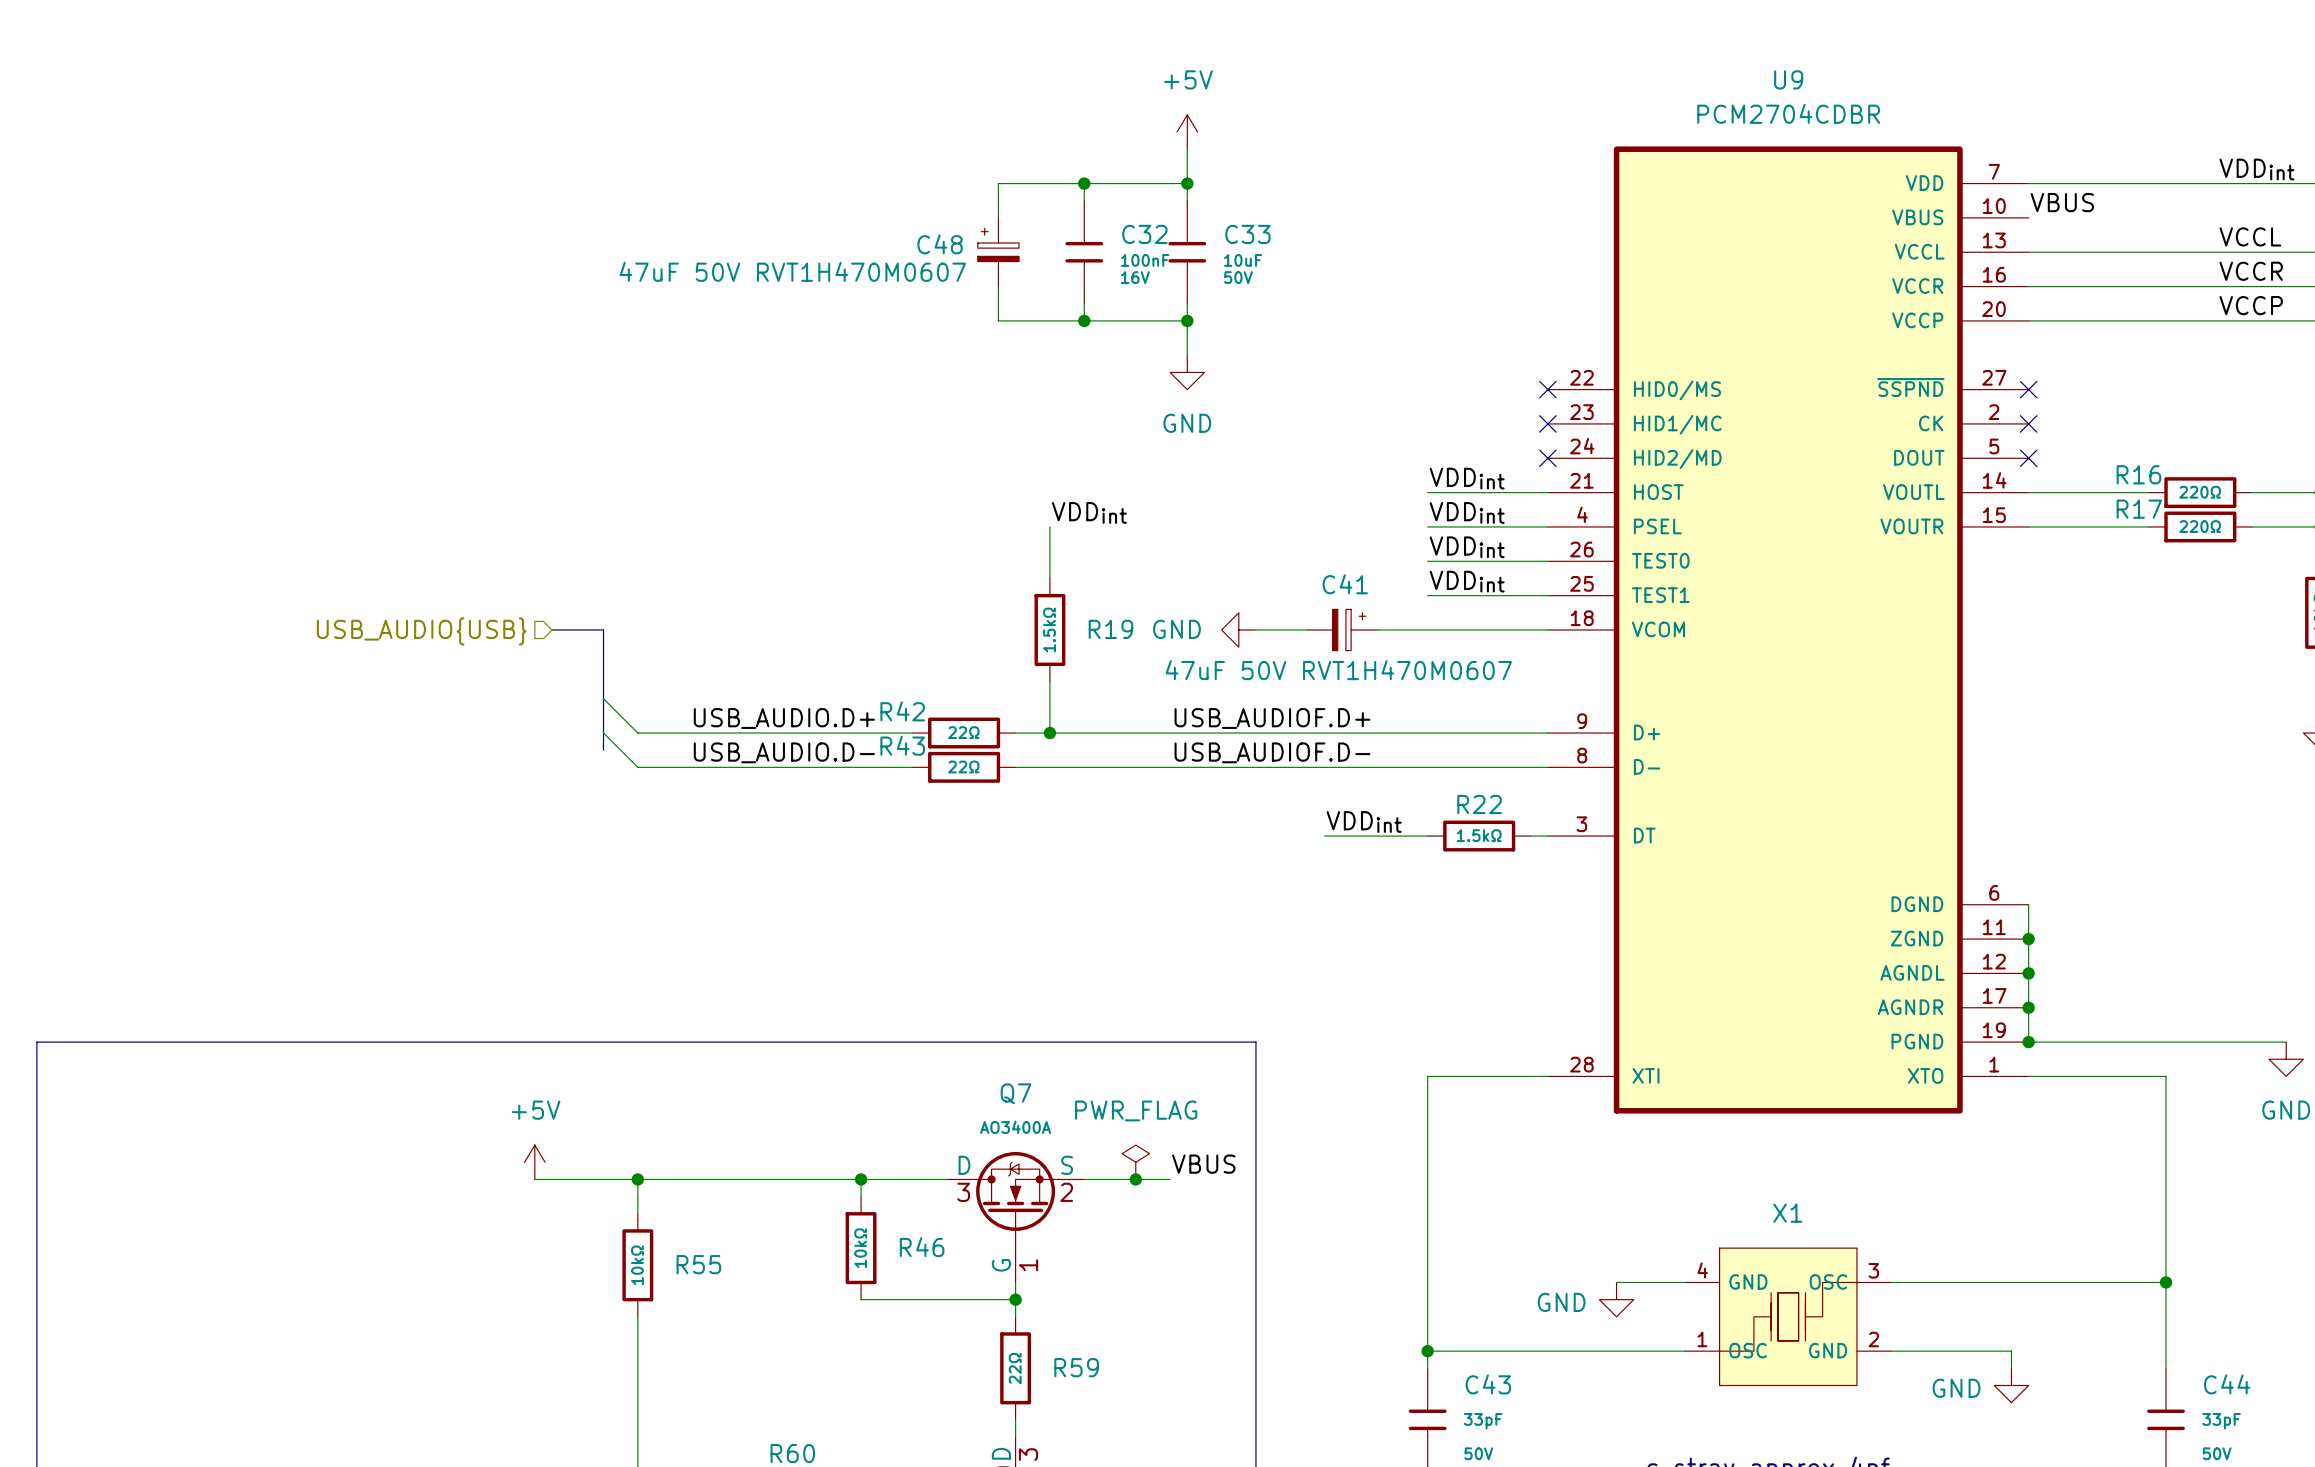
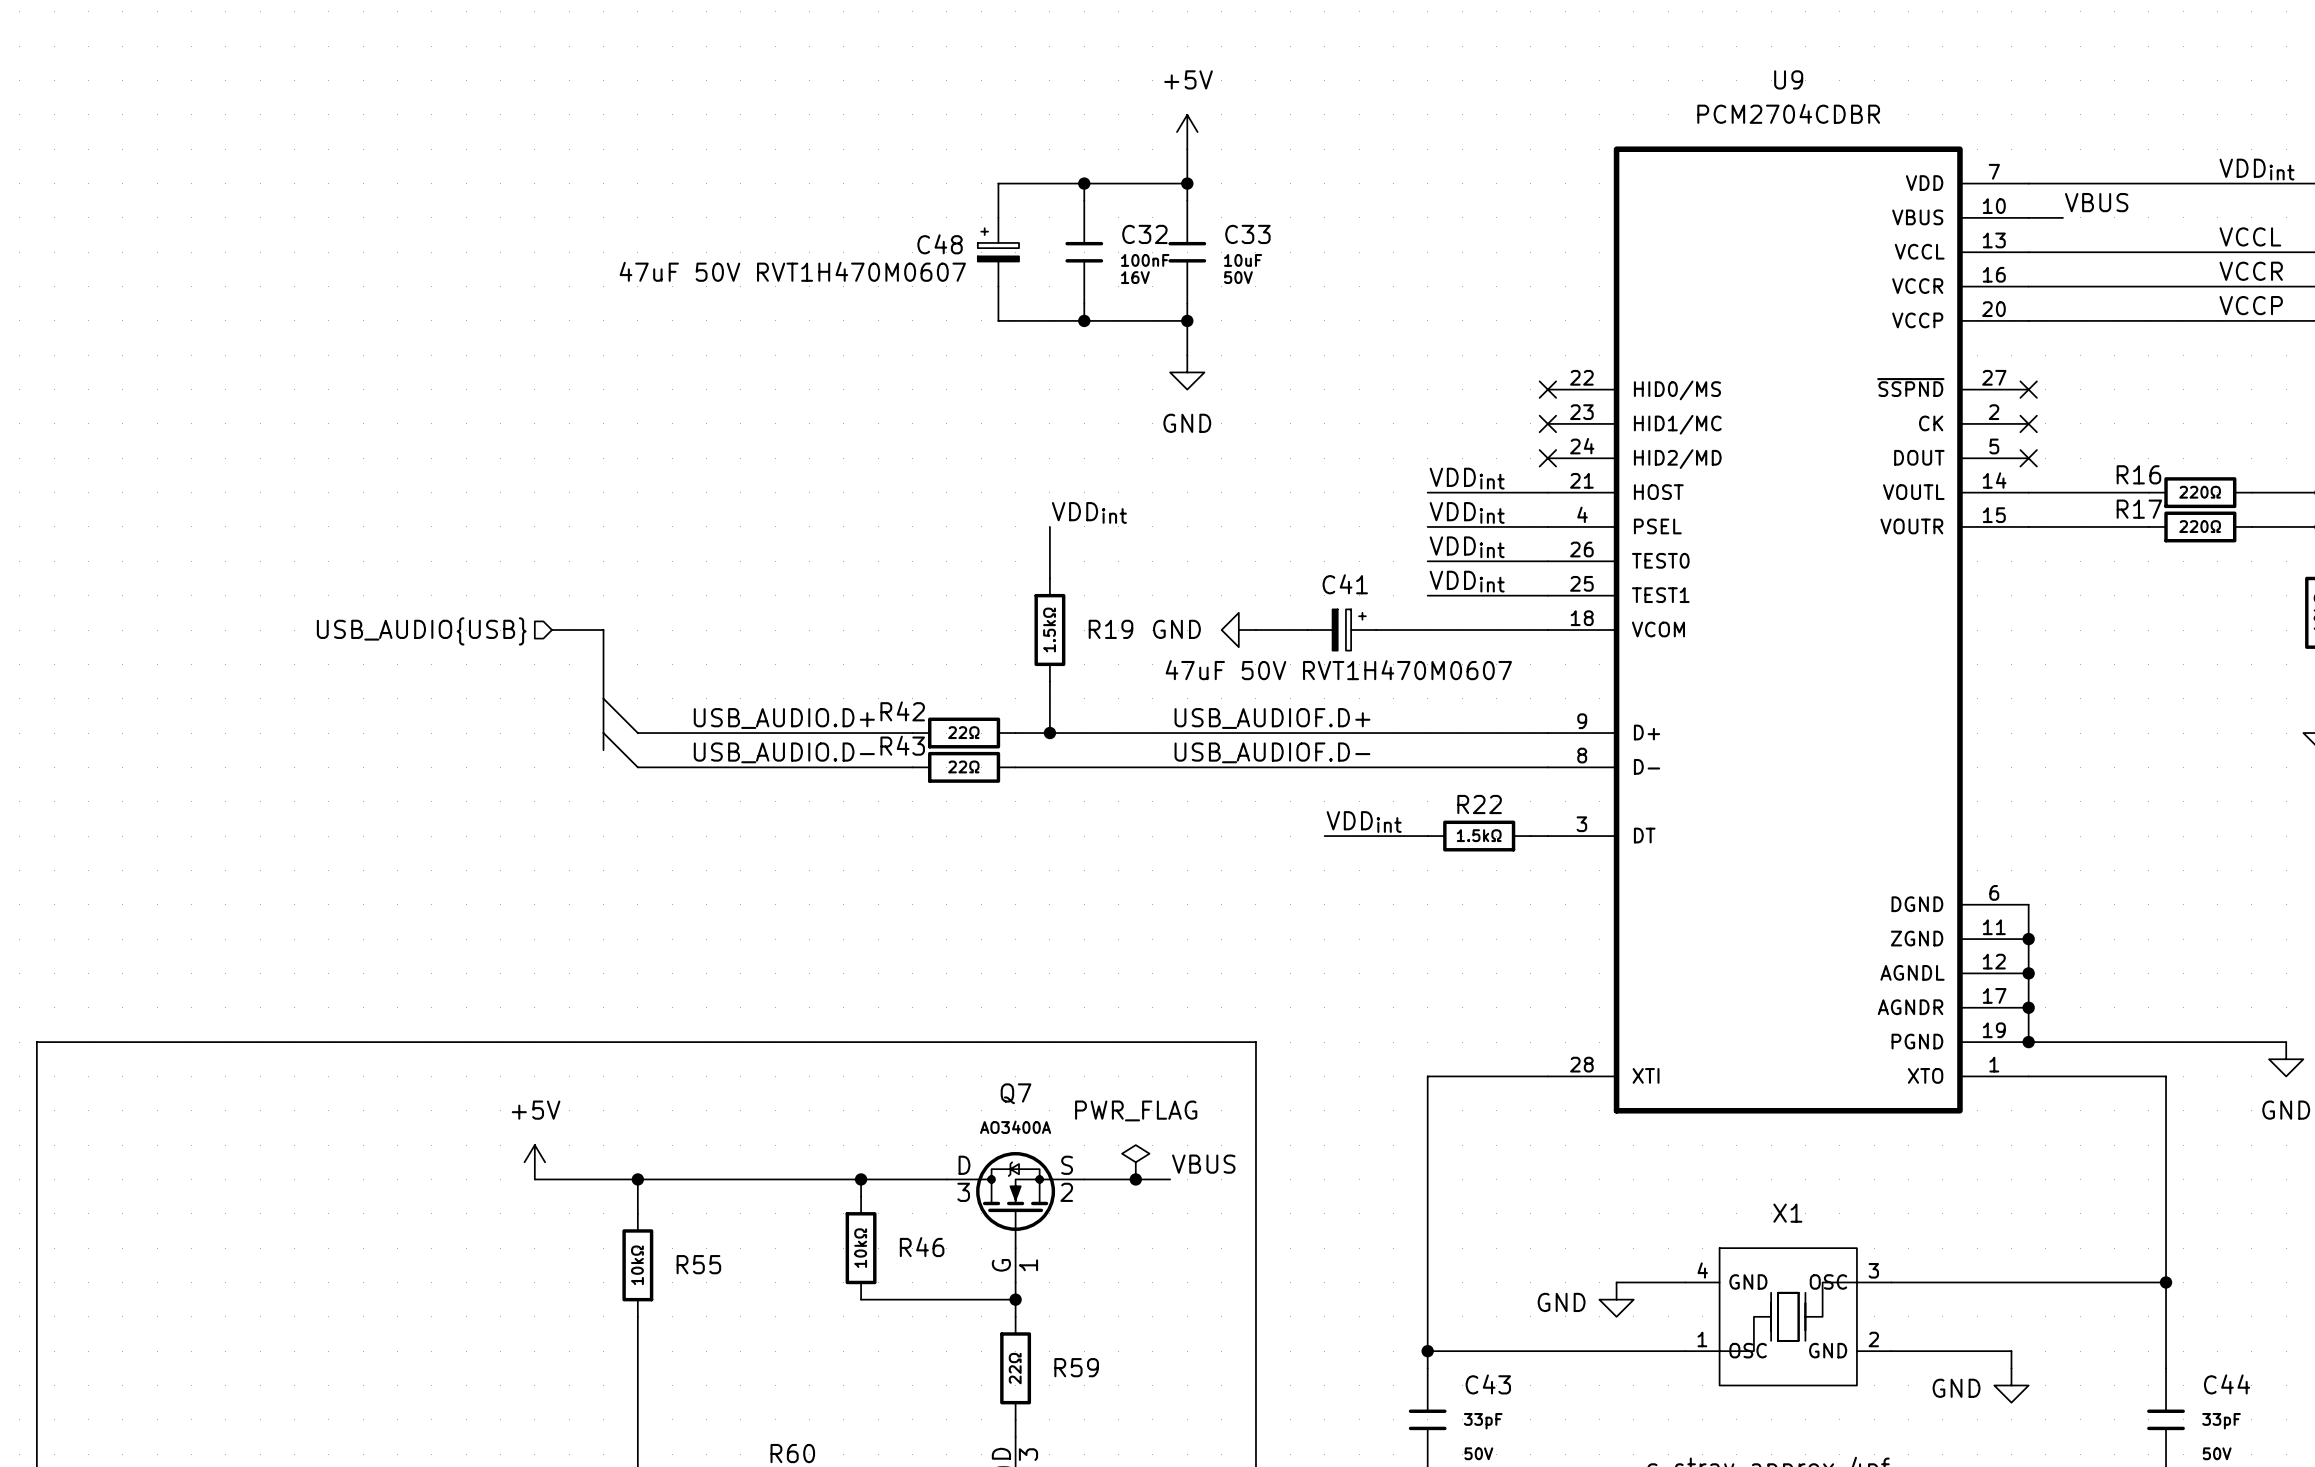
label position: VBUS (2062, 202) -> VBUS (2096, 202)
wire: none -> (2028, 217) (2062, 217)

